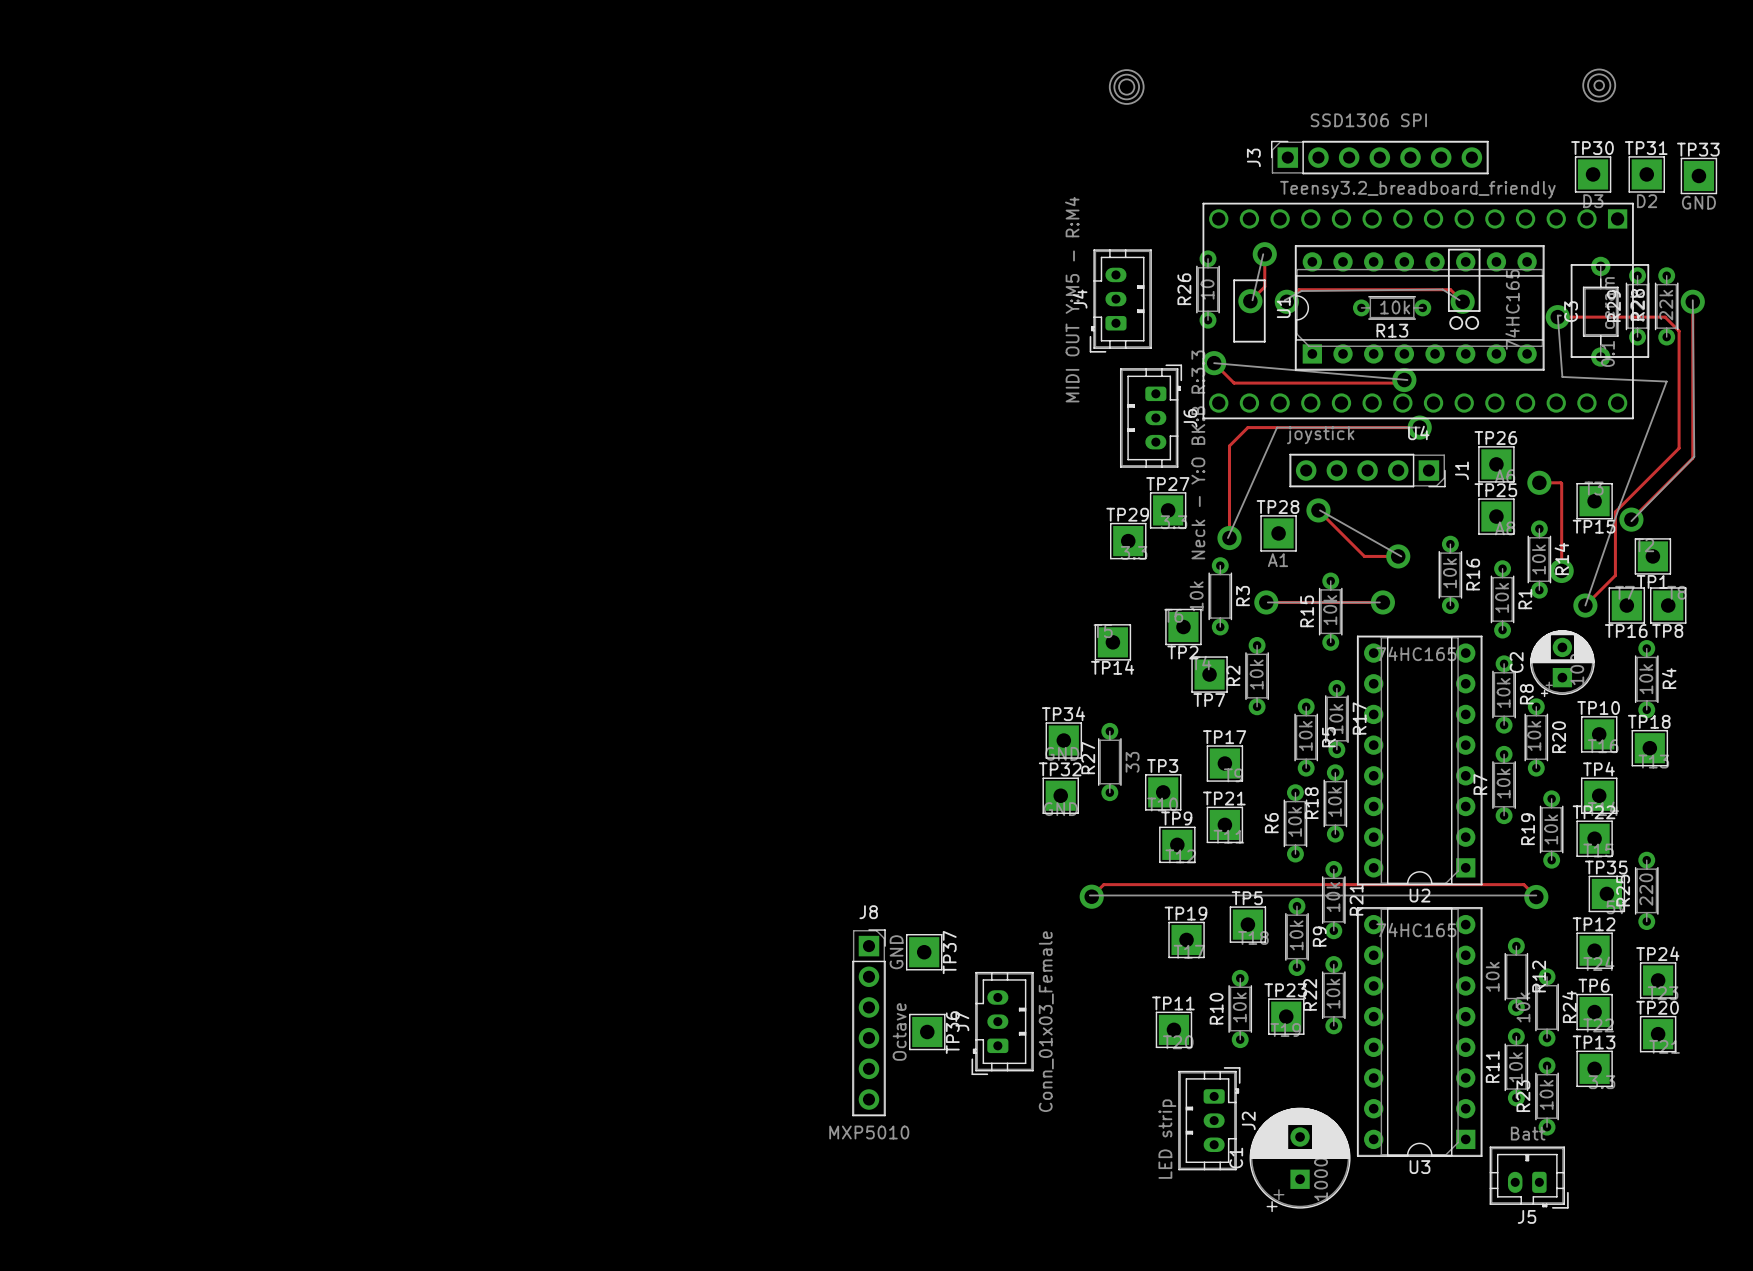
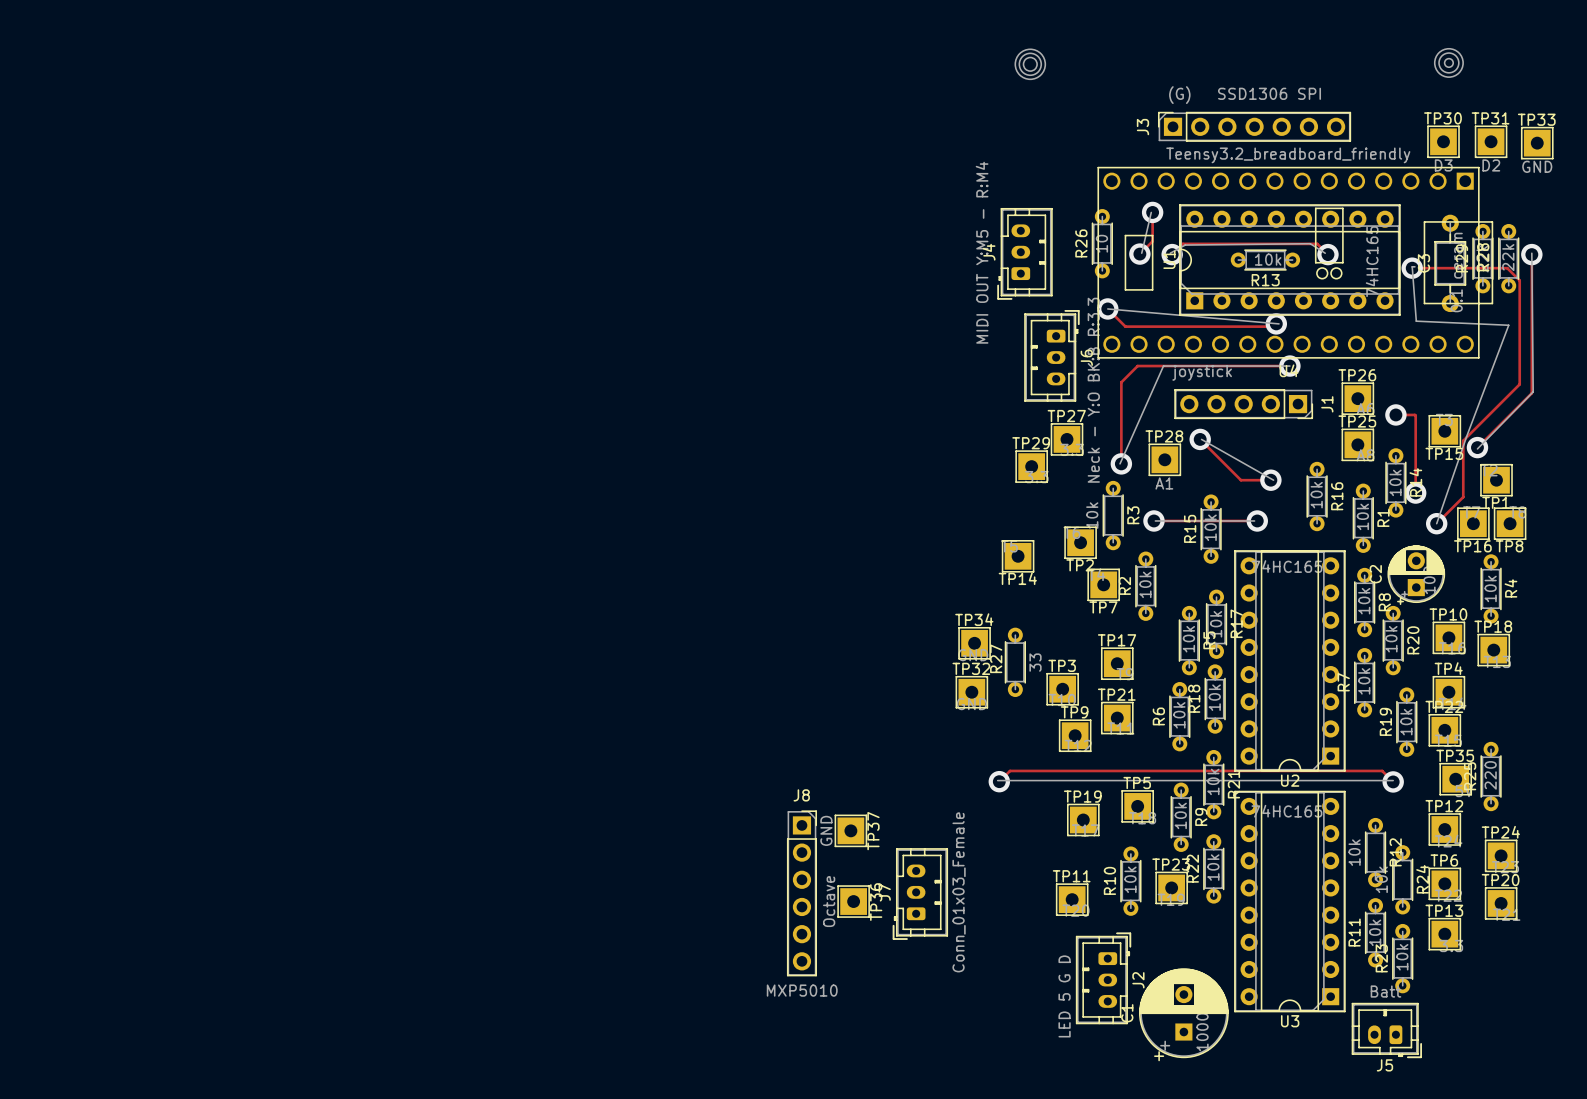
J3 value: SSD1306 SPI (1368, 120) -> (G) SSD1306 SPI (1245, 95)
J2 value: LED strip (1167, 1139) -> LED 5 G D (1064, 996)

